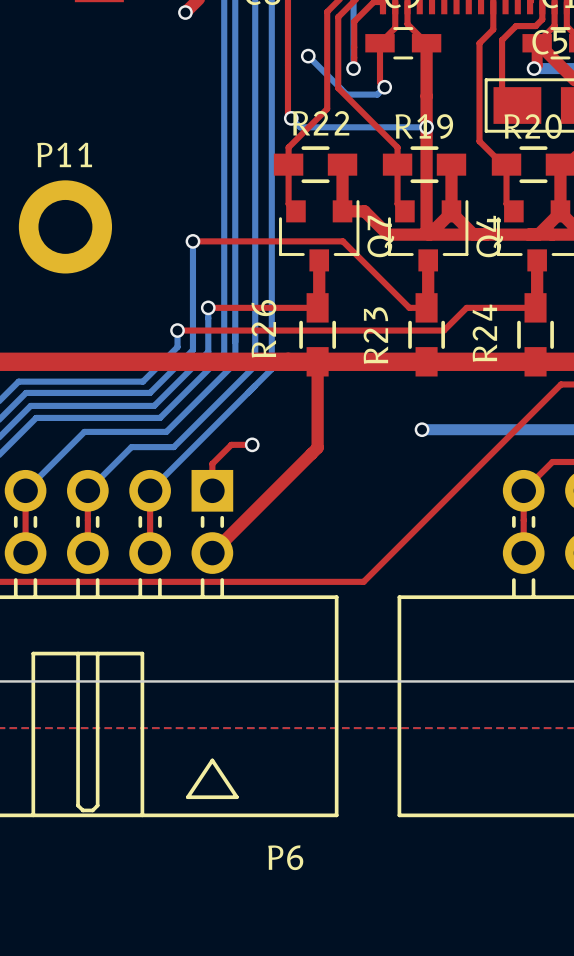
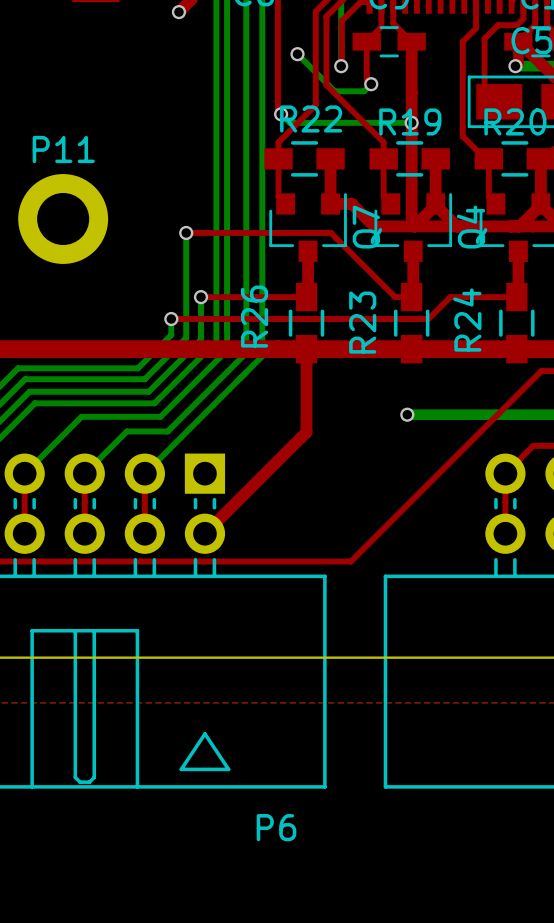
top track: (252, 444) (231, 444) (212, 463) (212, 490) -> none
via: (252, 444) -> none

